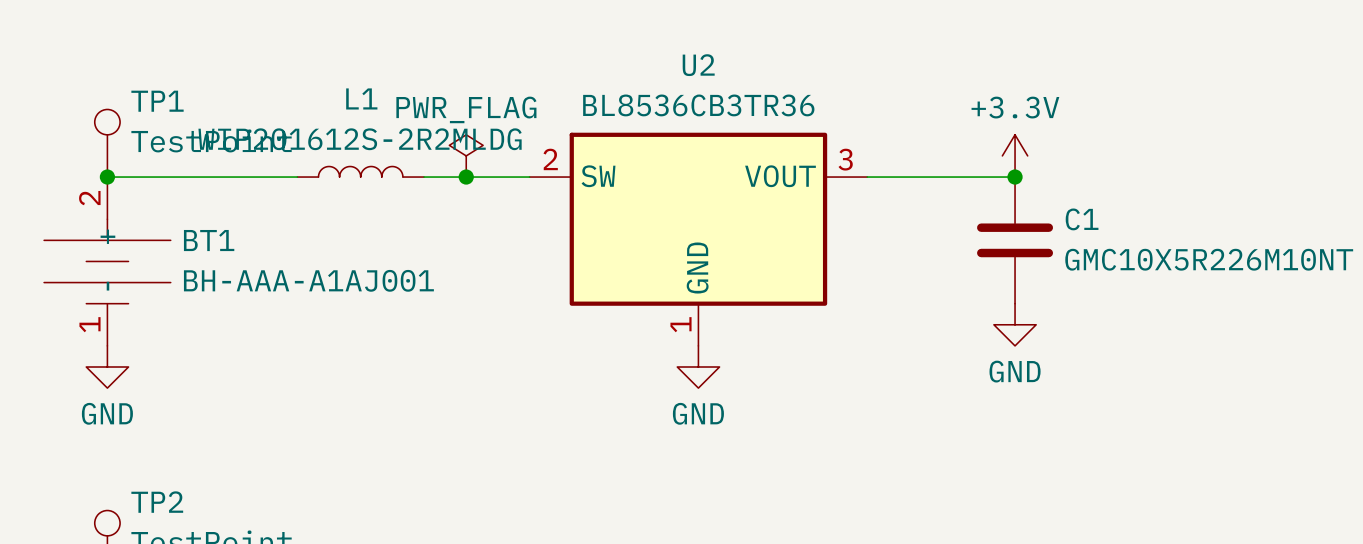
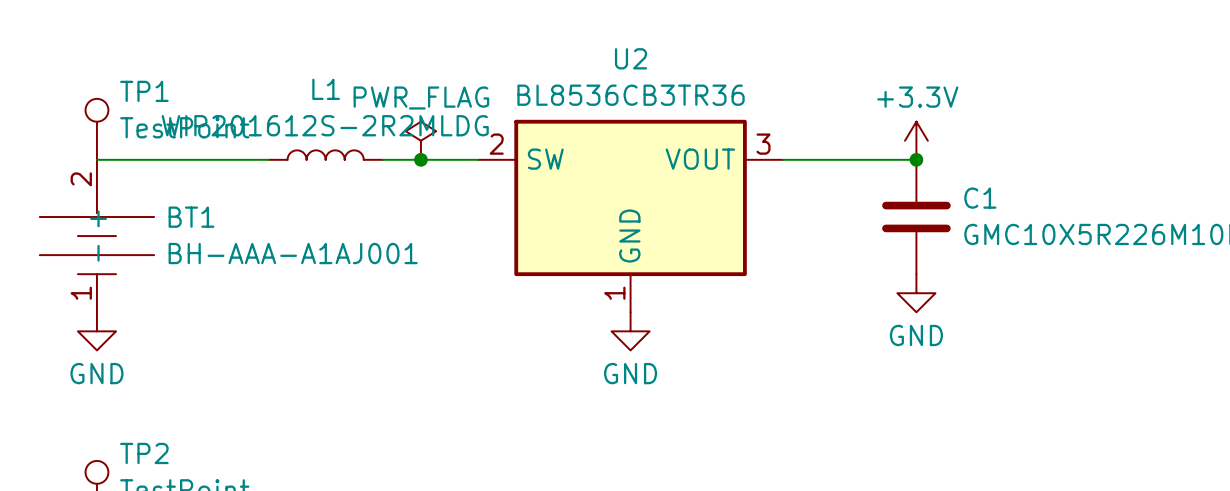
junction: (107, 177) -> none

